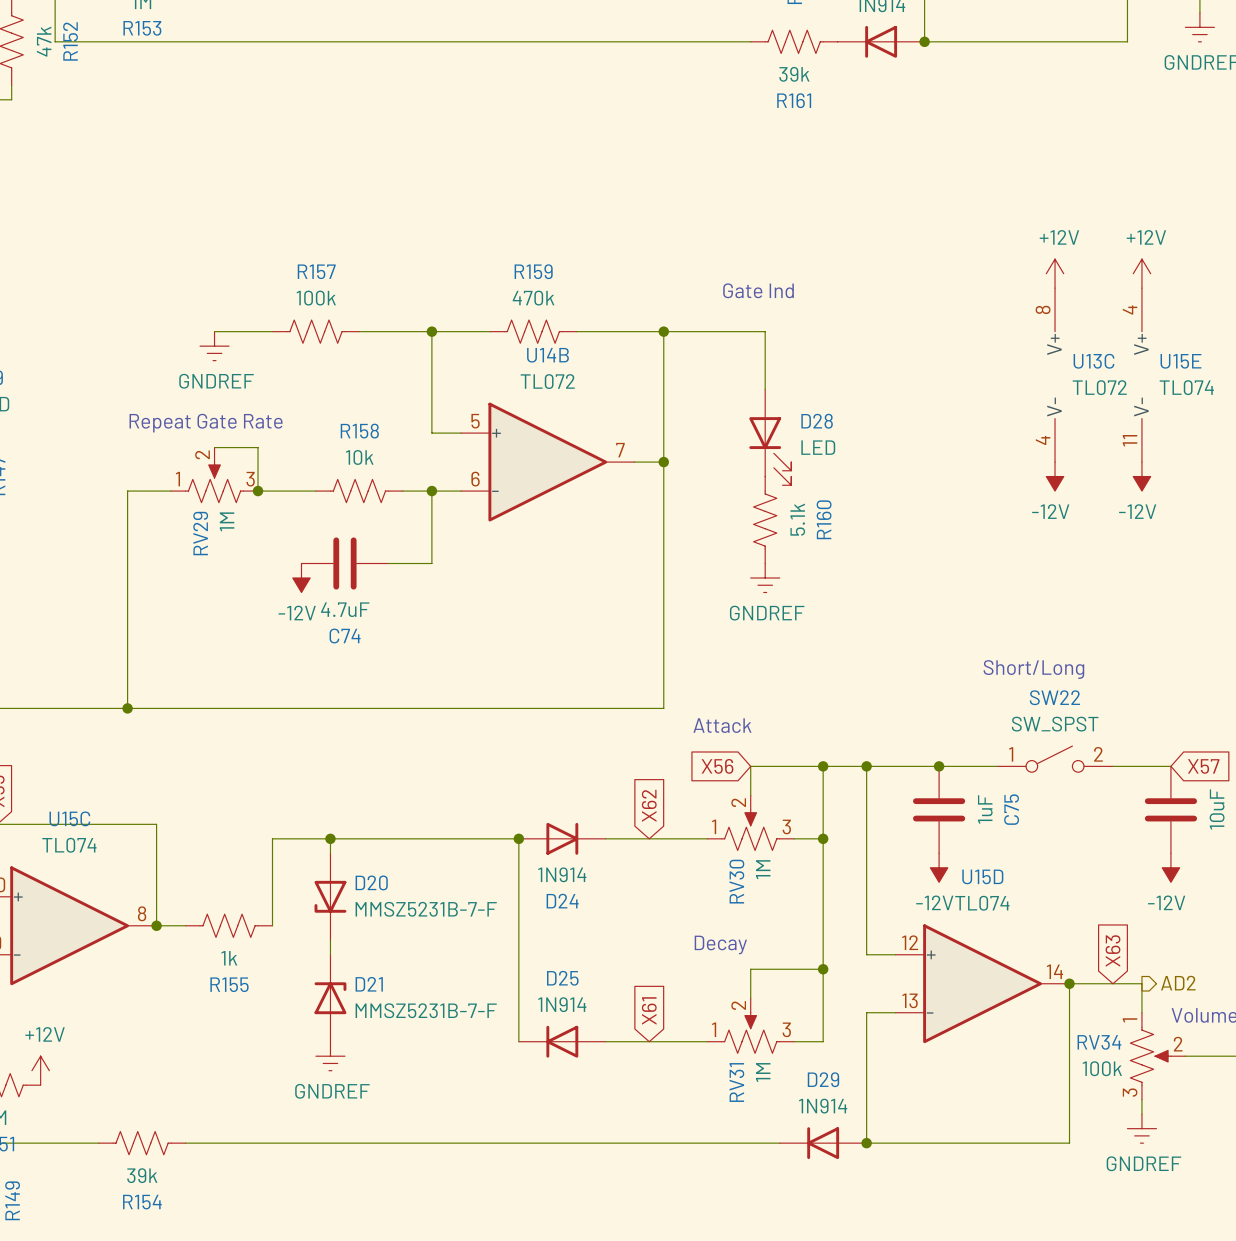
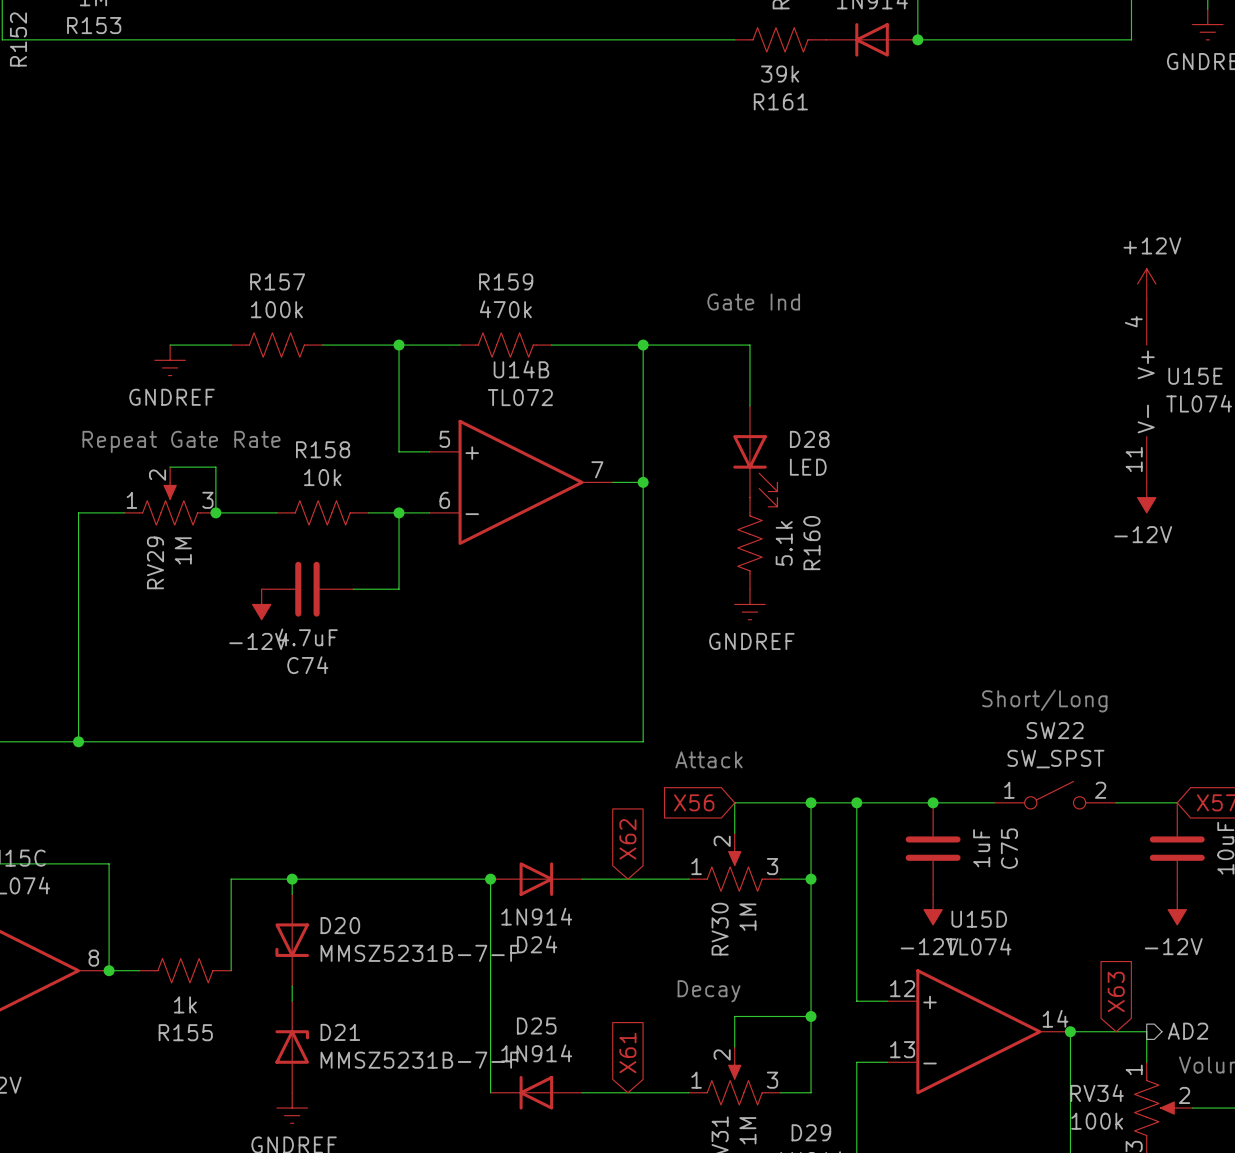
power symbol: +12V (1055, 273) -> none
U13C: TL072 (1055, 375) -> none
power symbol: -12V (1055, 476) -> none

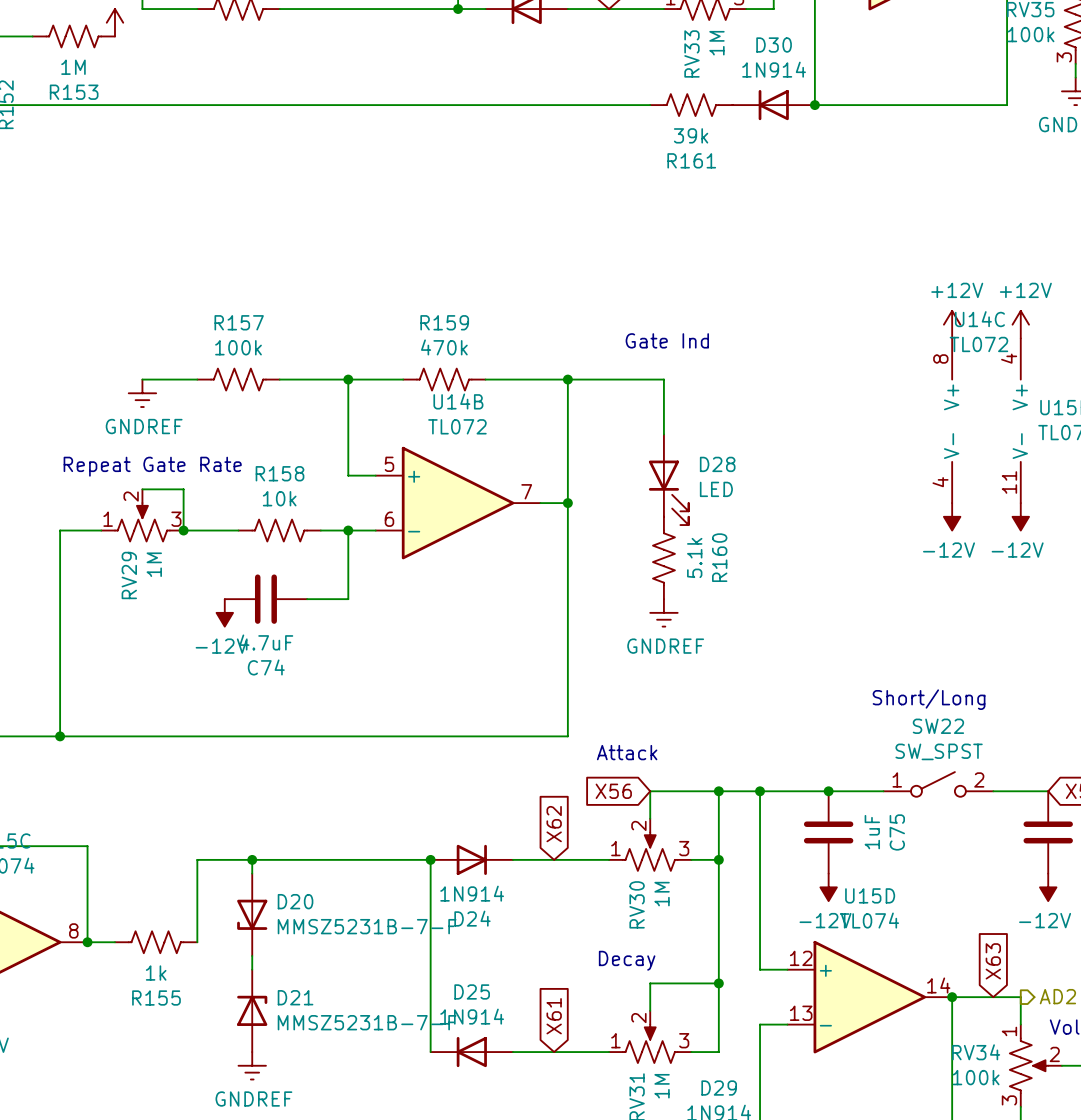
power symbol: none -> +12V (952, 324)
U14C: none -> TL072 (952, 420)
power symbol: none -> -12V (952, 516)

